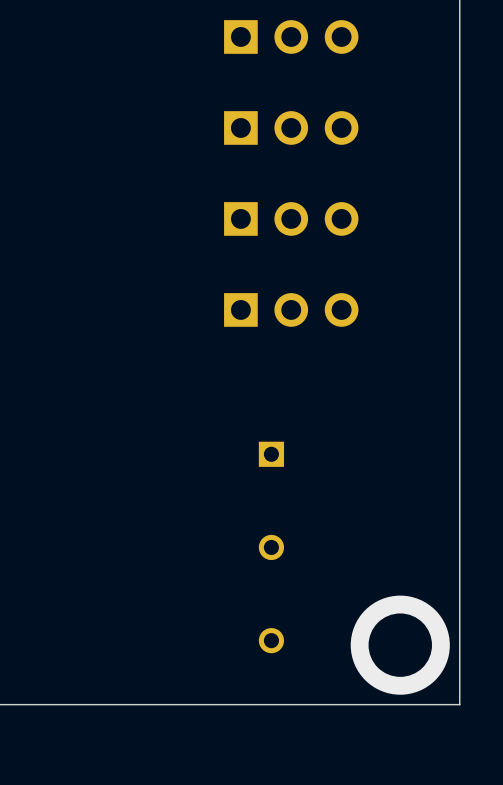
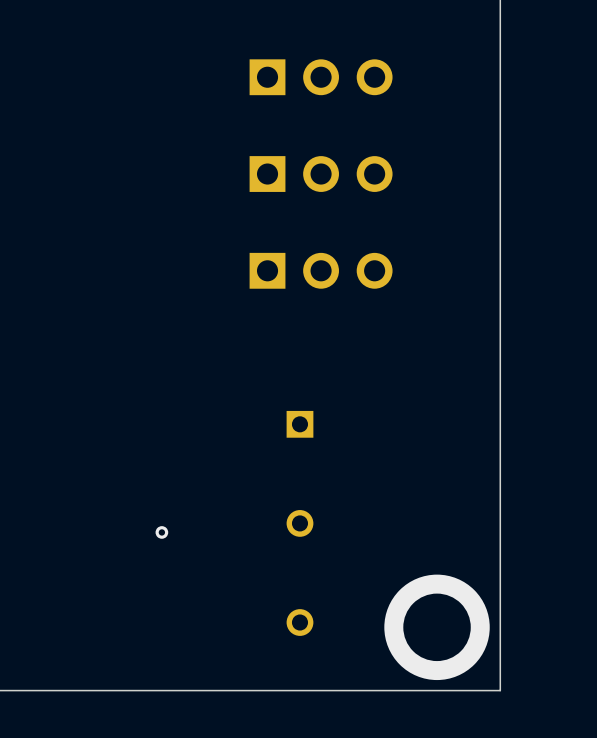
via: none -> (161, 532)

